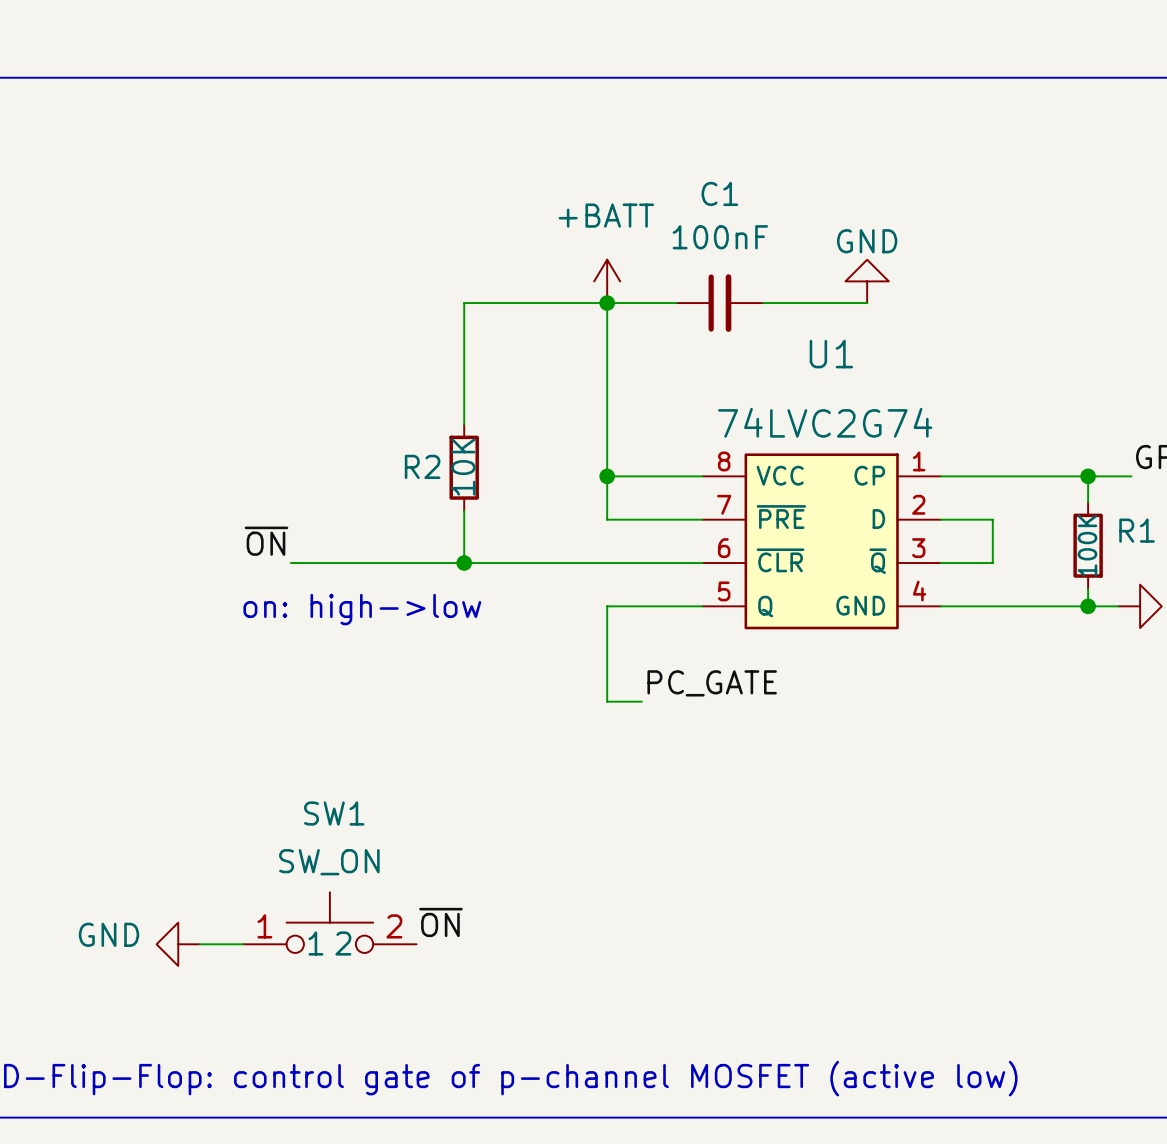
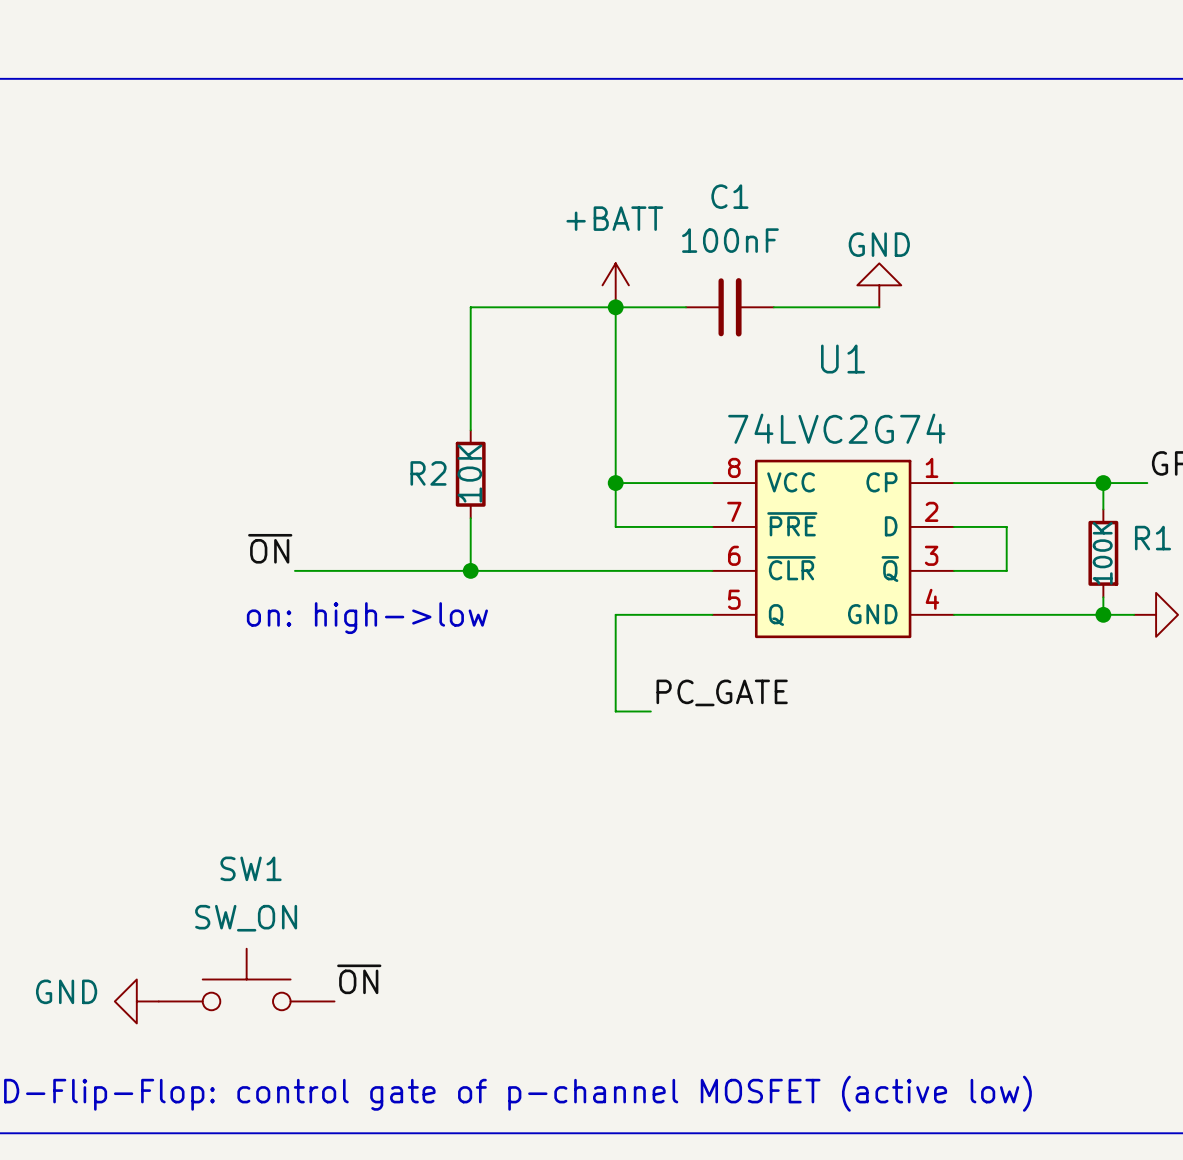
SW1 position: (329, 922) -> (246, 979)
label position: ~{ON} (440, 922) -> ~{ON} (359, 979)
SW1 pin number: 1 (264, 926) -> none
SW1 pin number: 2 (394, 926) -> none
SW1 pin name: 1 (315, 943) -> none
SW1 pin name: 2 (343, 943) -> none
power symbol position: GND (178, 944) -> GND (136, 1001)
wire: (199, 944) (243, 944) -> none

